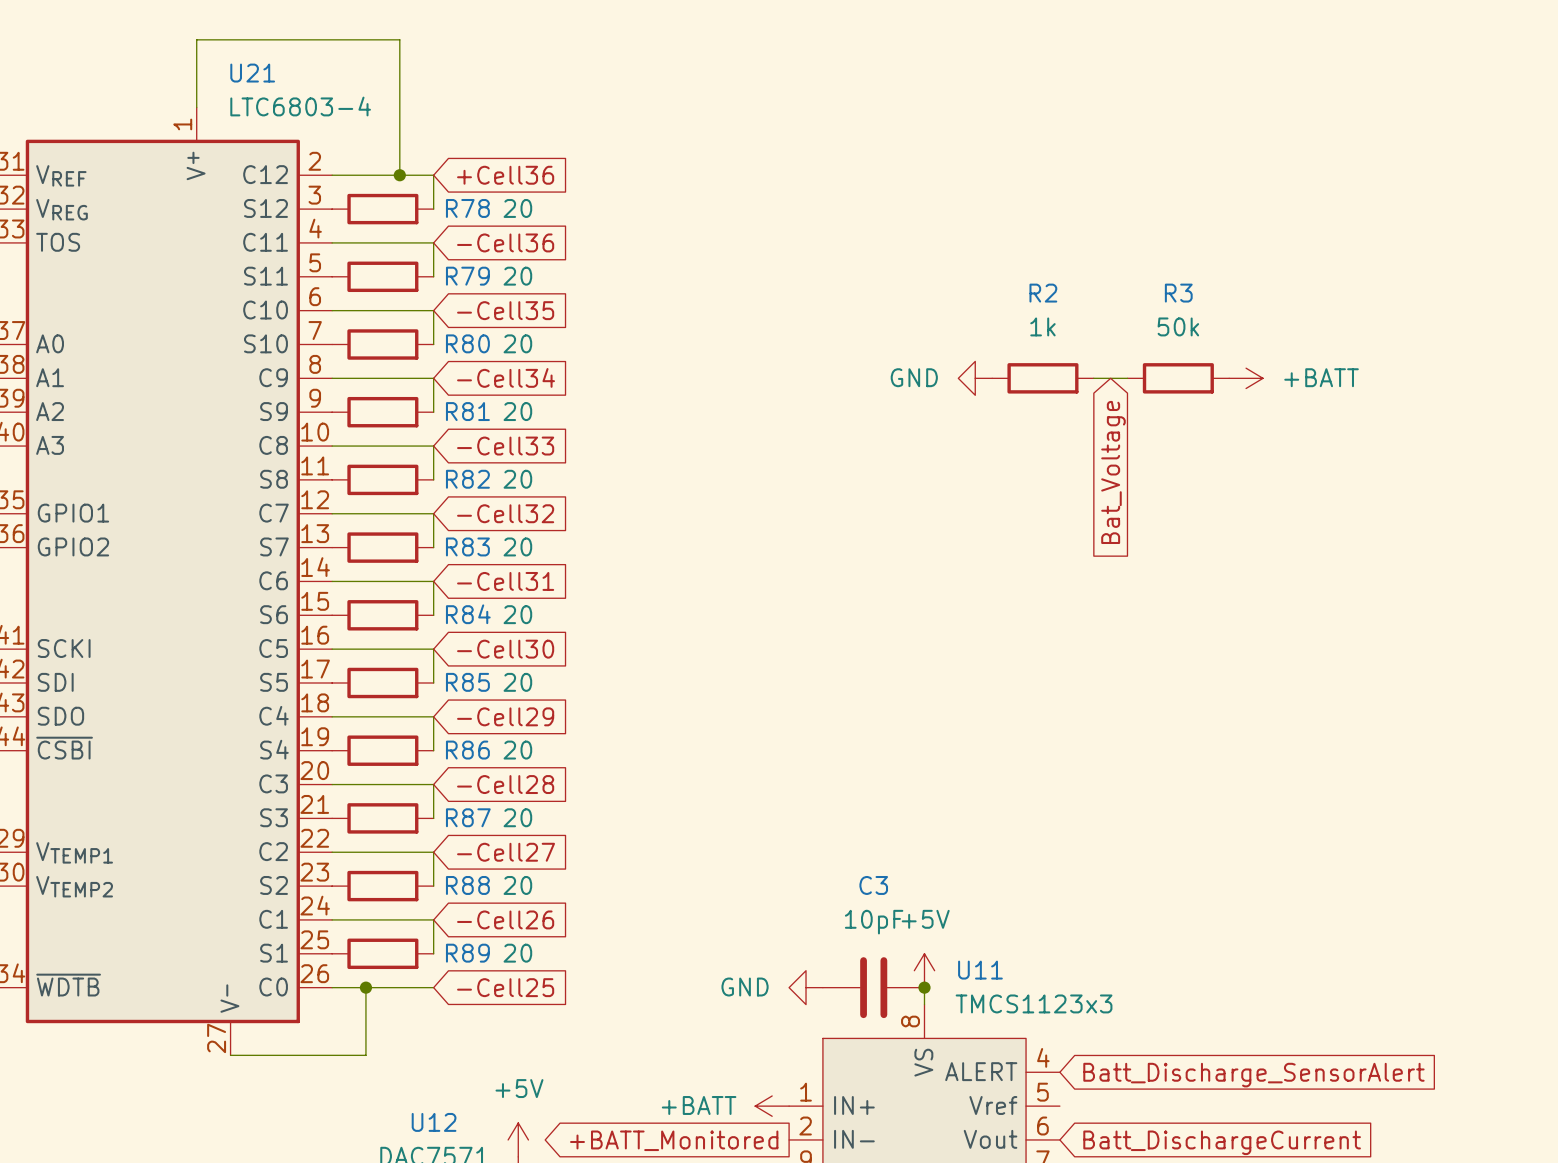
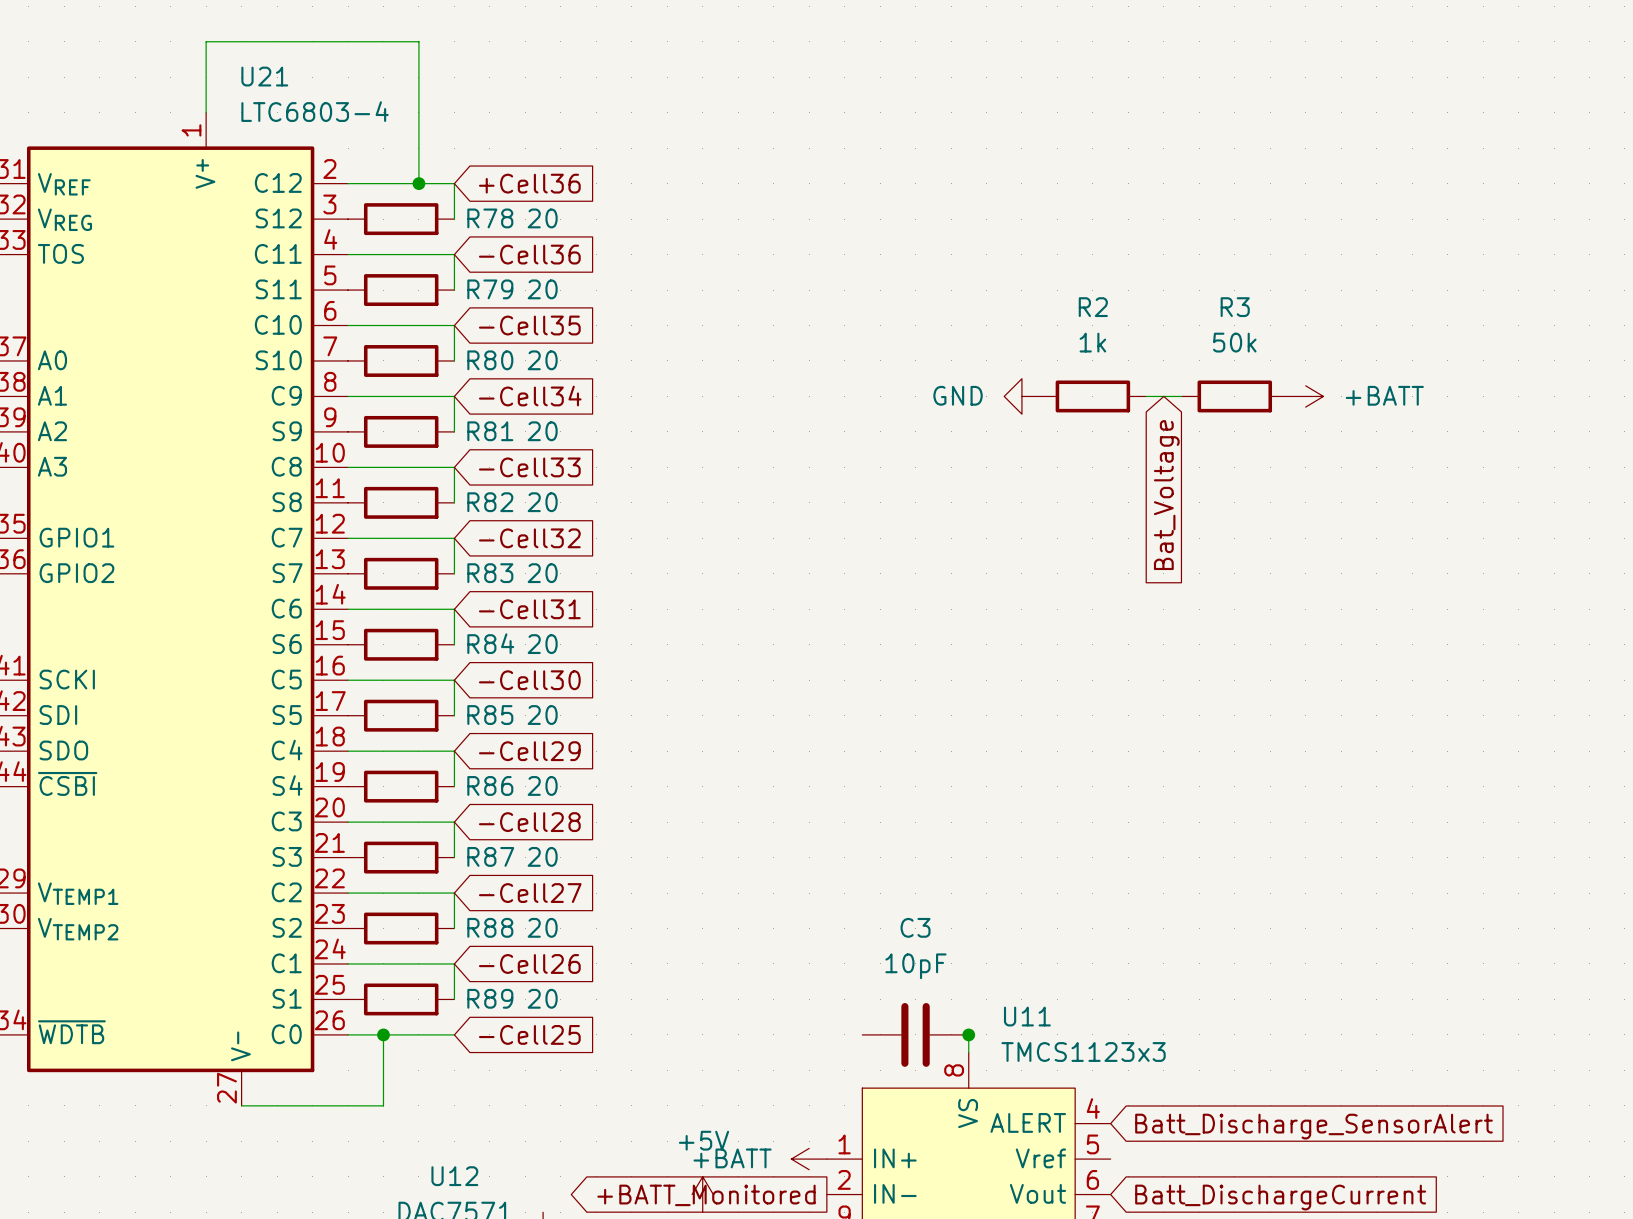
power symbol: +5V (924, 970) -> none
power symbol: GND (806, 987) -> none
power symbol position: +5V (518, 1139) -> +5V (702, 1194)

